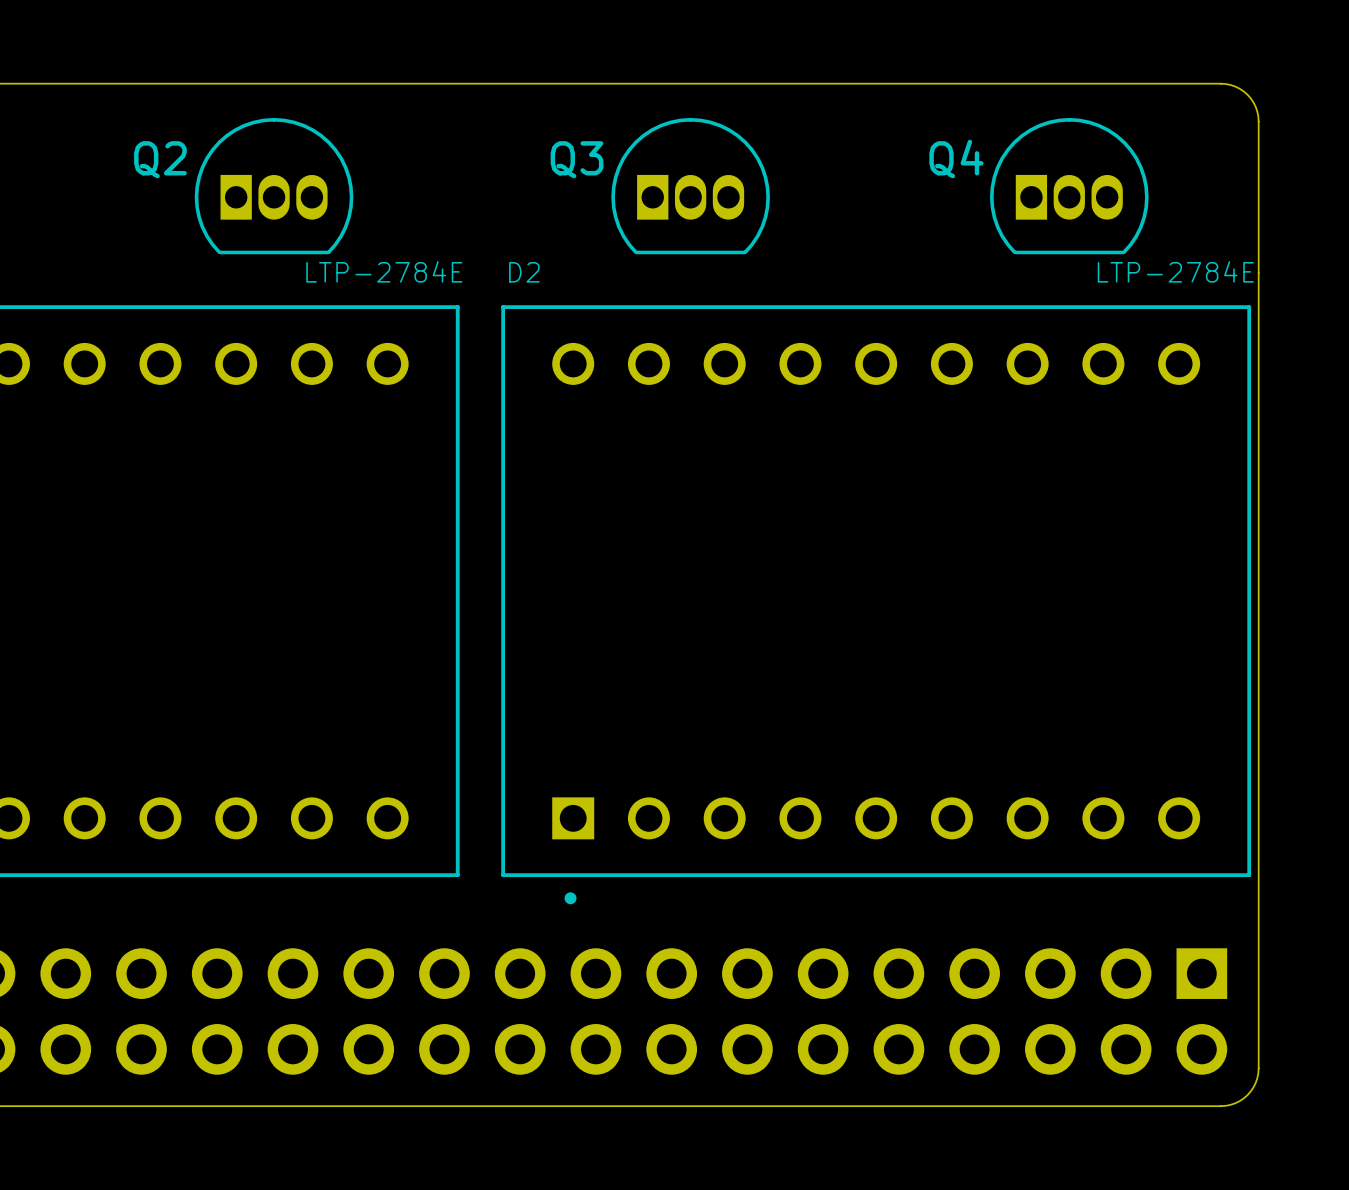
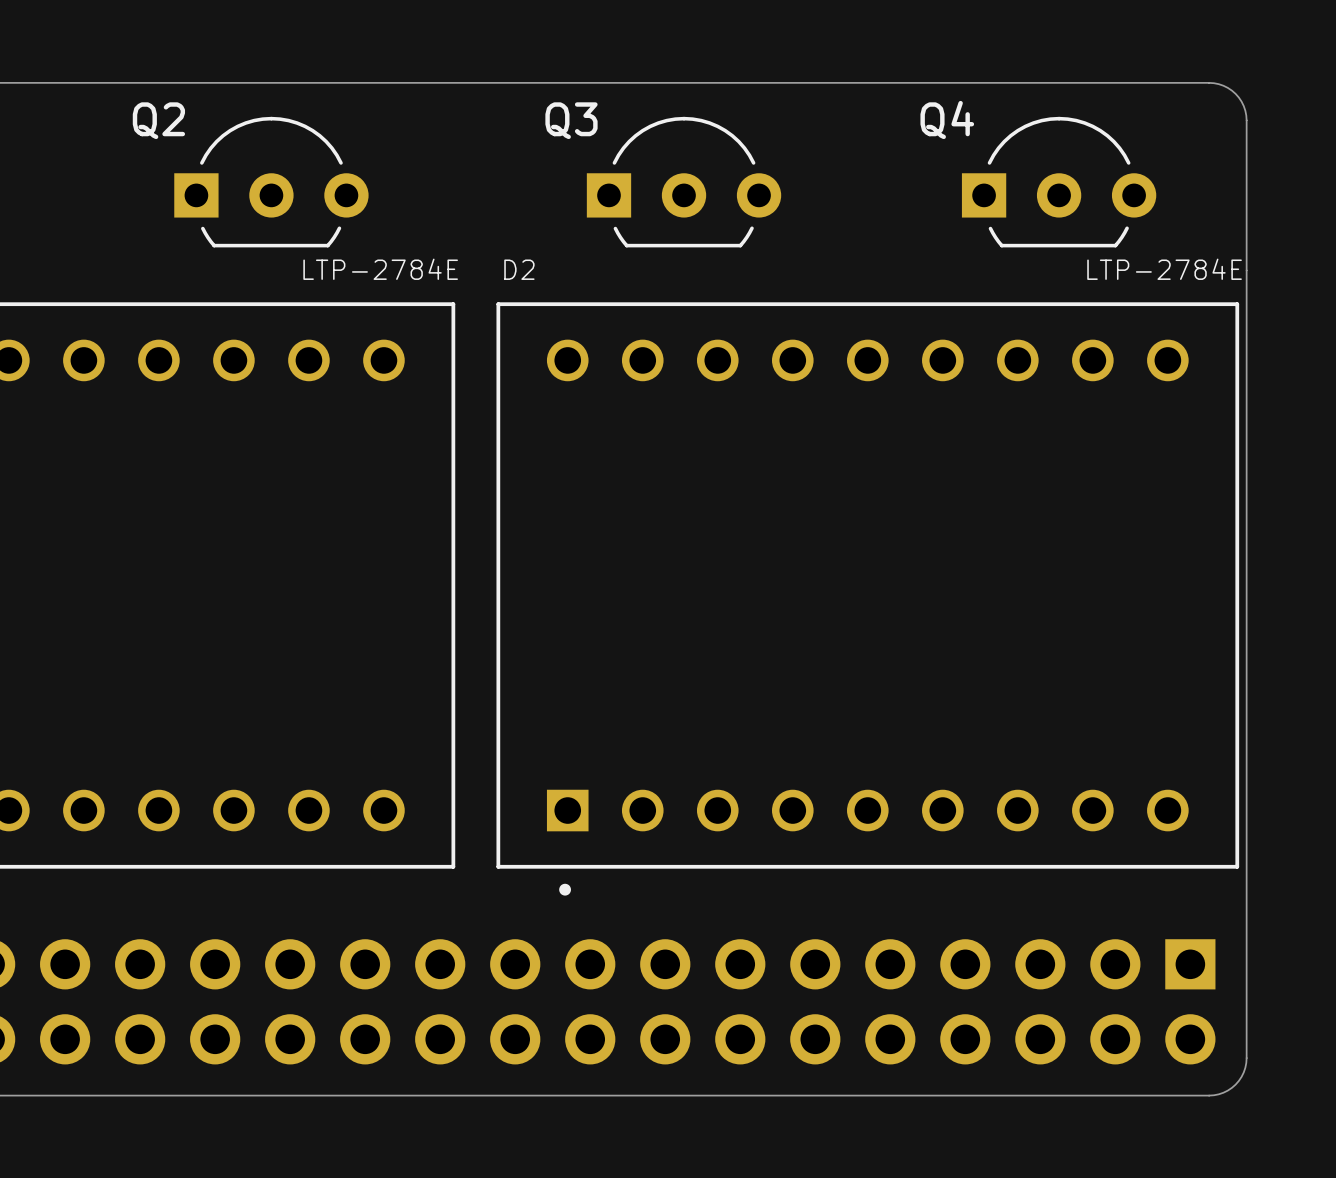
Q2 footprint: [194, 117, 354, 255] -> [174, 116, 369, 248]
Q3 footprint: [611, 117, 770, 255] -> [586, 116, 782, 248]
Q4 footprint: [989, 117, 1149, 255] -> [961, 116, 1157, 248]

